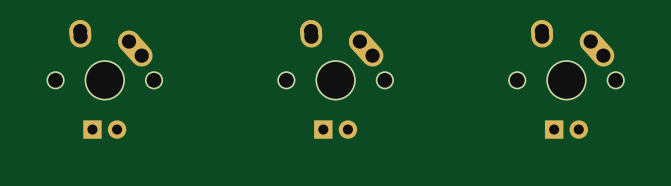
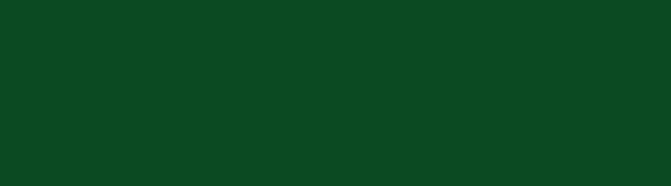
part: (104, 79) -> none
part: (335, 79) -> none
part: (566, 79) -> none

